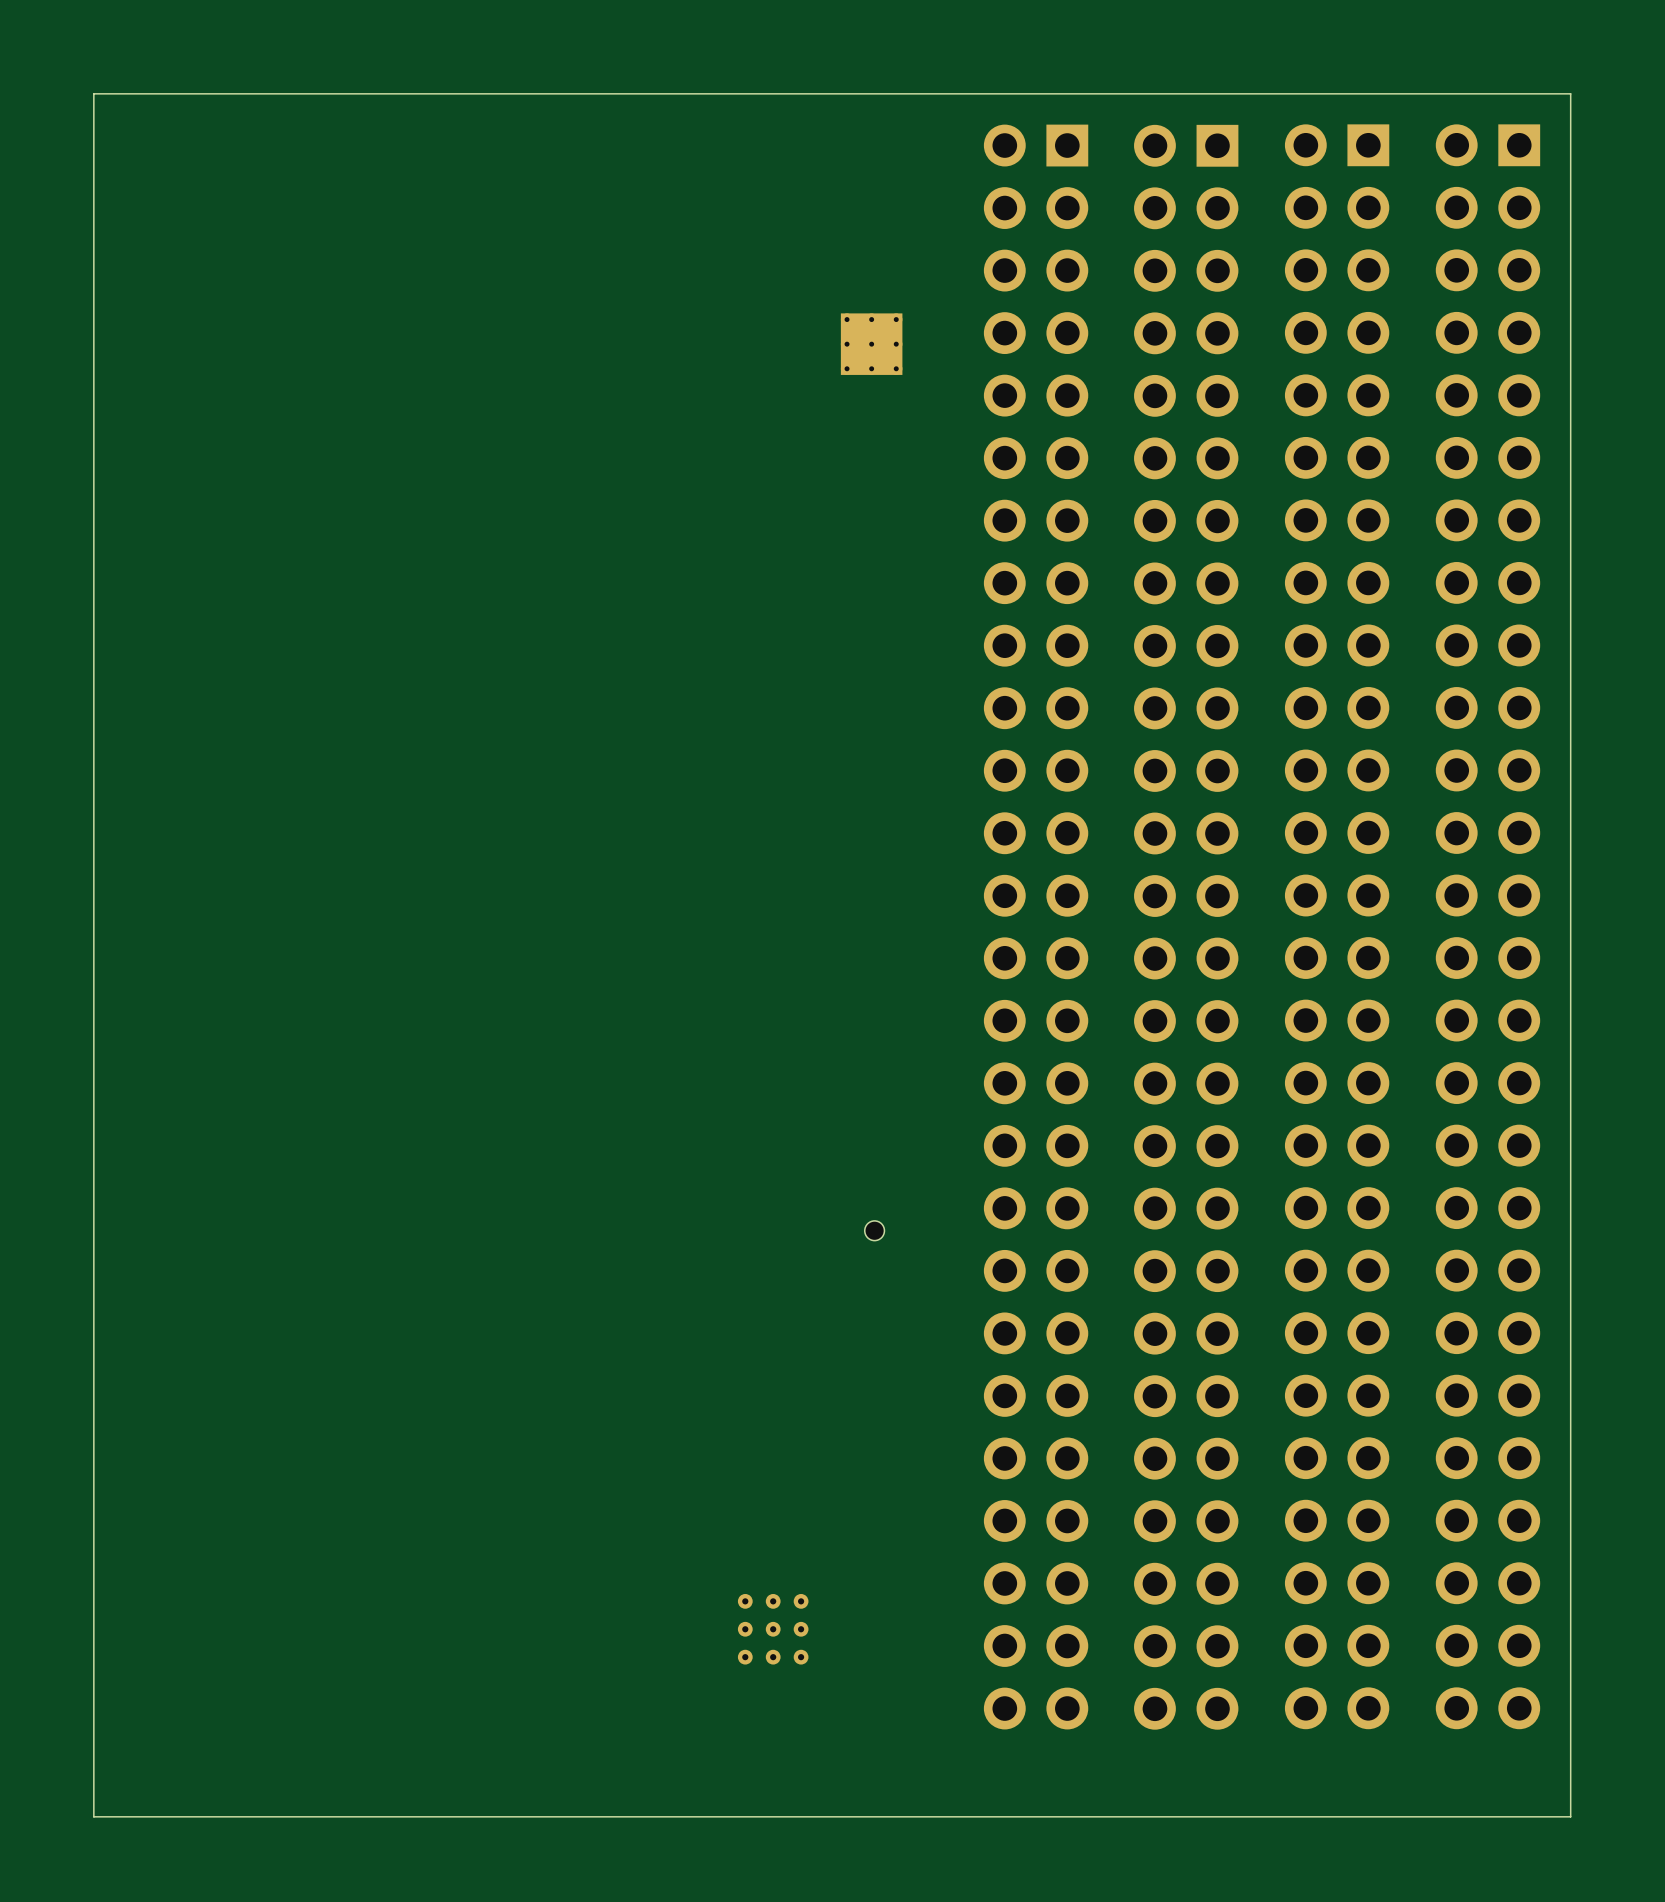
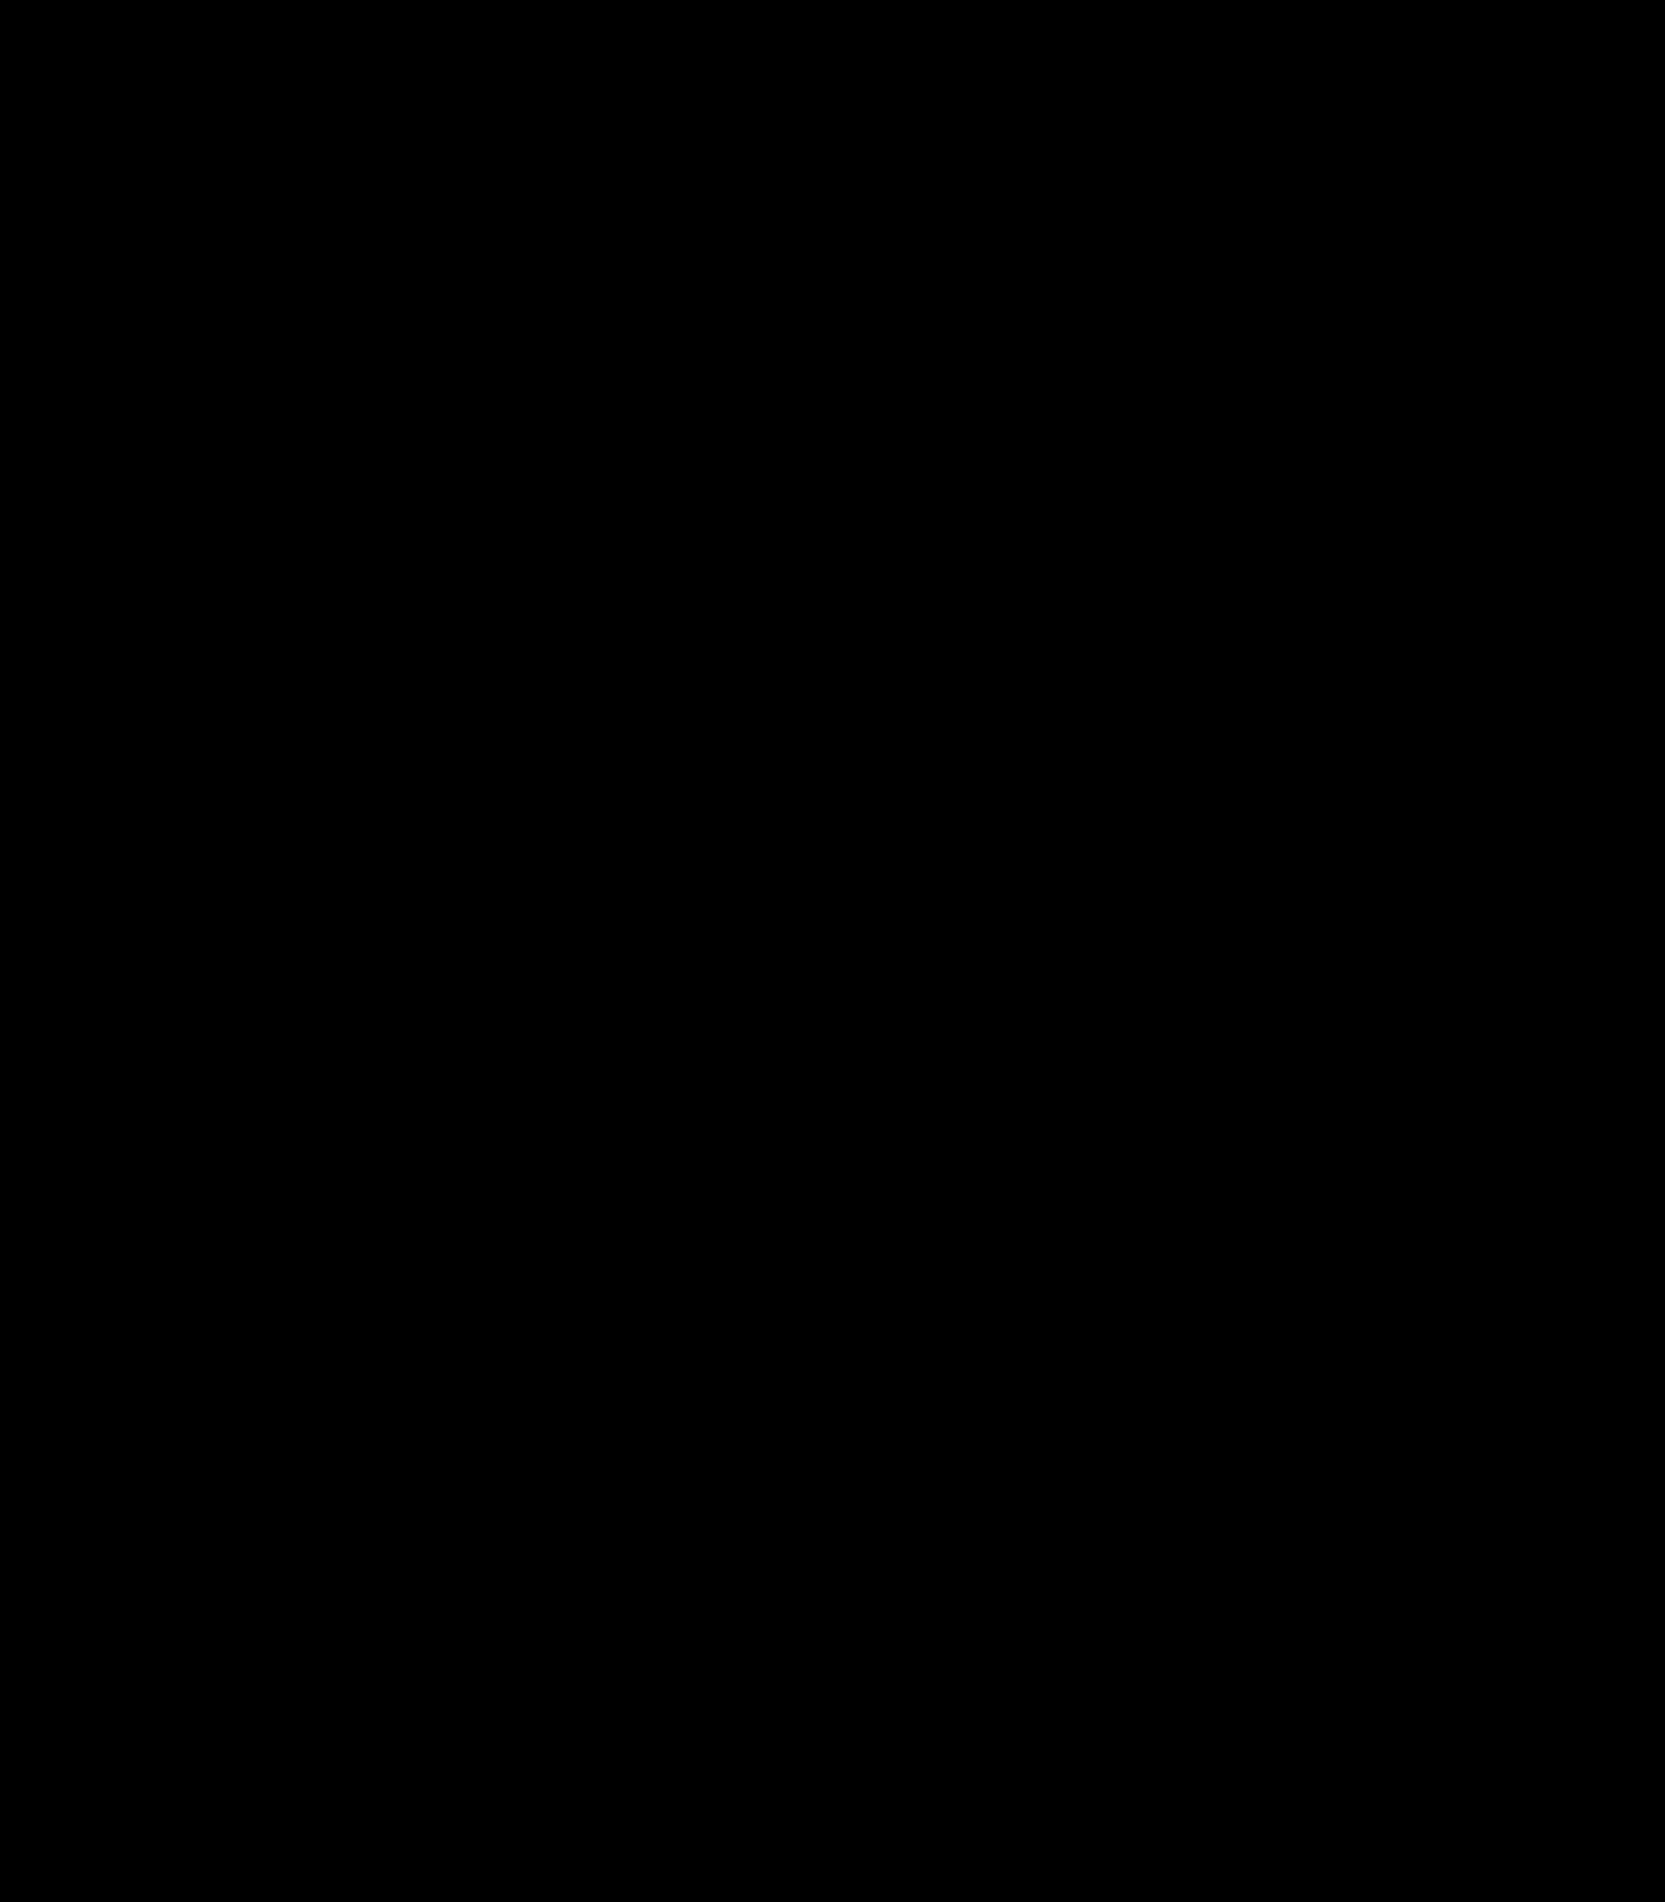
board edge: (1570, 93) (93, 93) (93, 1816) (1570, 1816) (1570, 93) -> none
part: (871, 344) -> none
part: (1337, 926) -> none
part: (1487, 926) -> none
part: (1036, 927) -> none
part: (1186, 927) -> none
part: (874, 1230) -> none
part: (773, 1629) -> none

